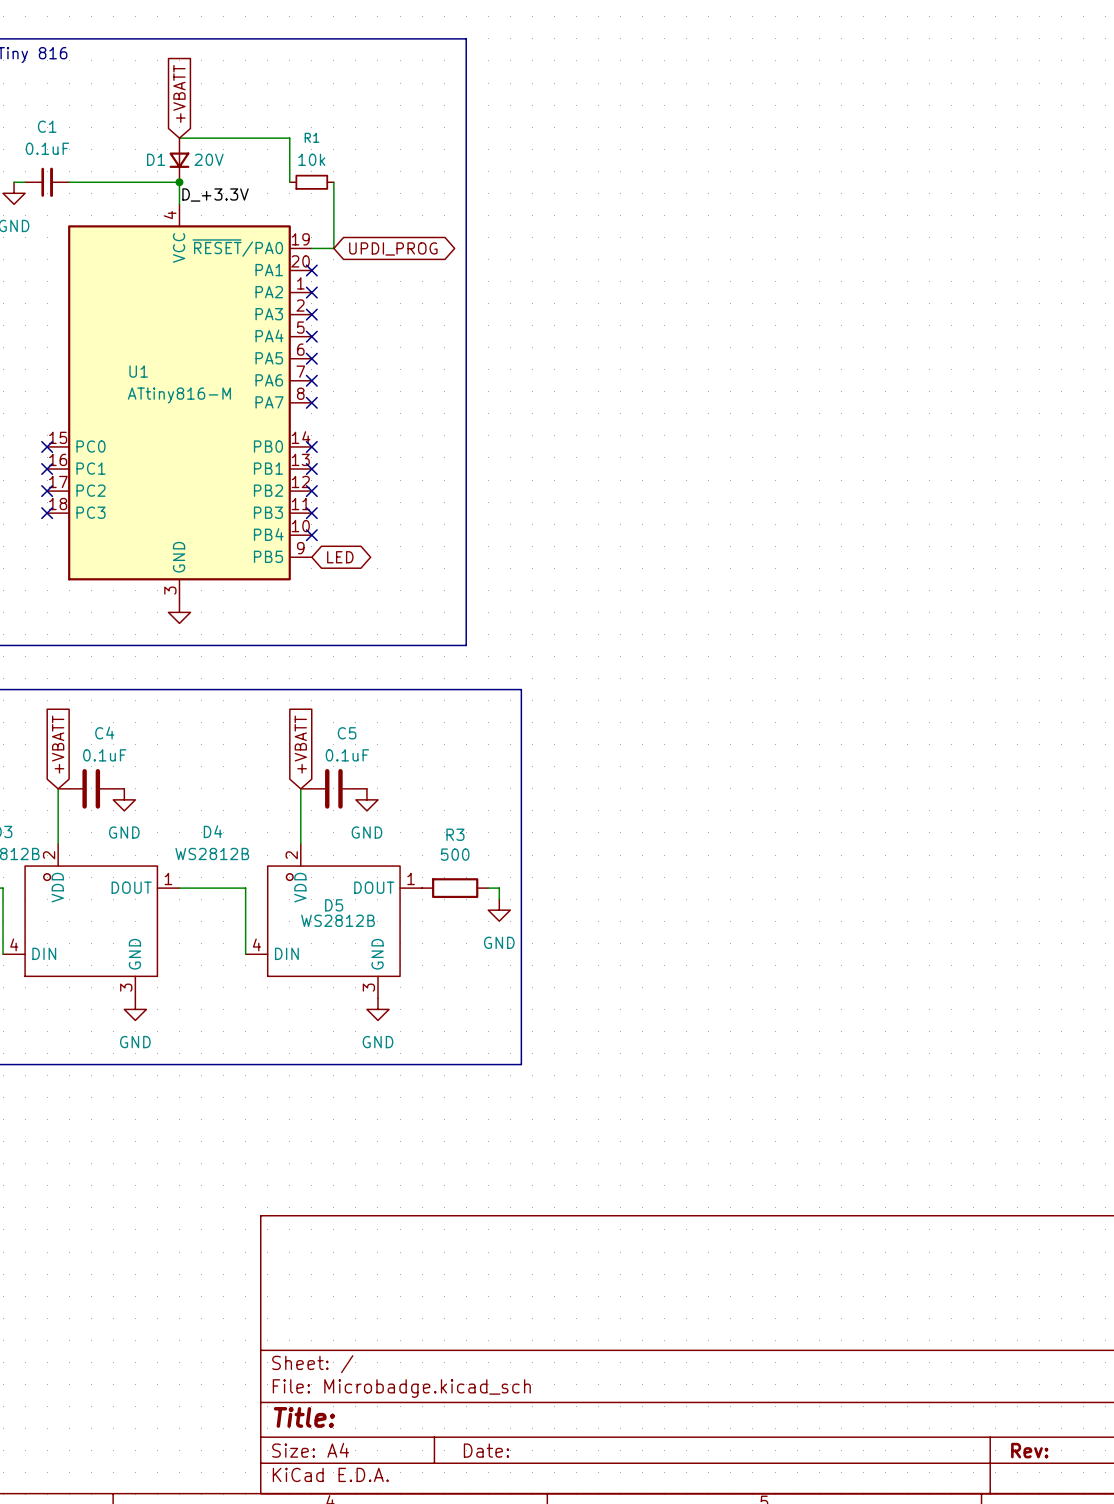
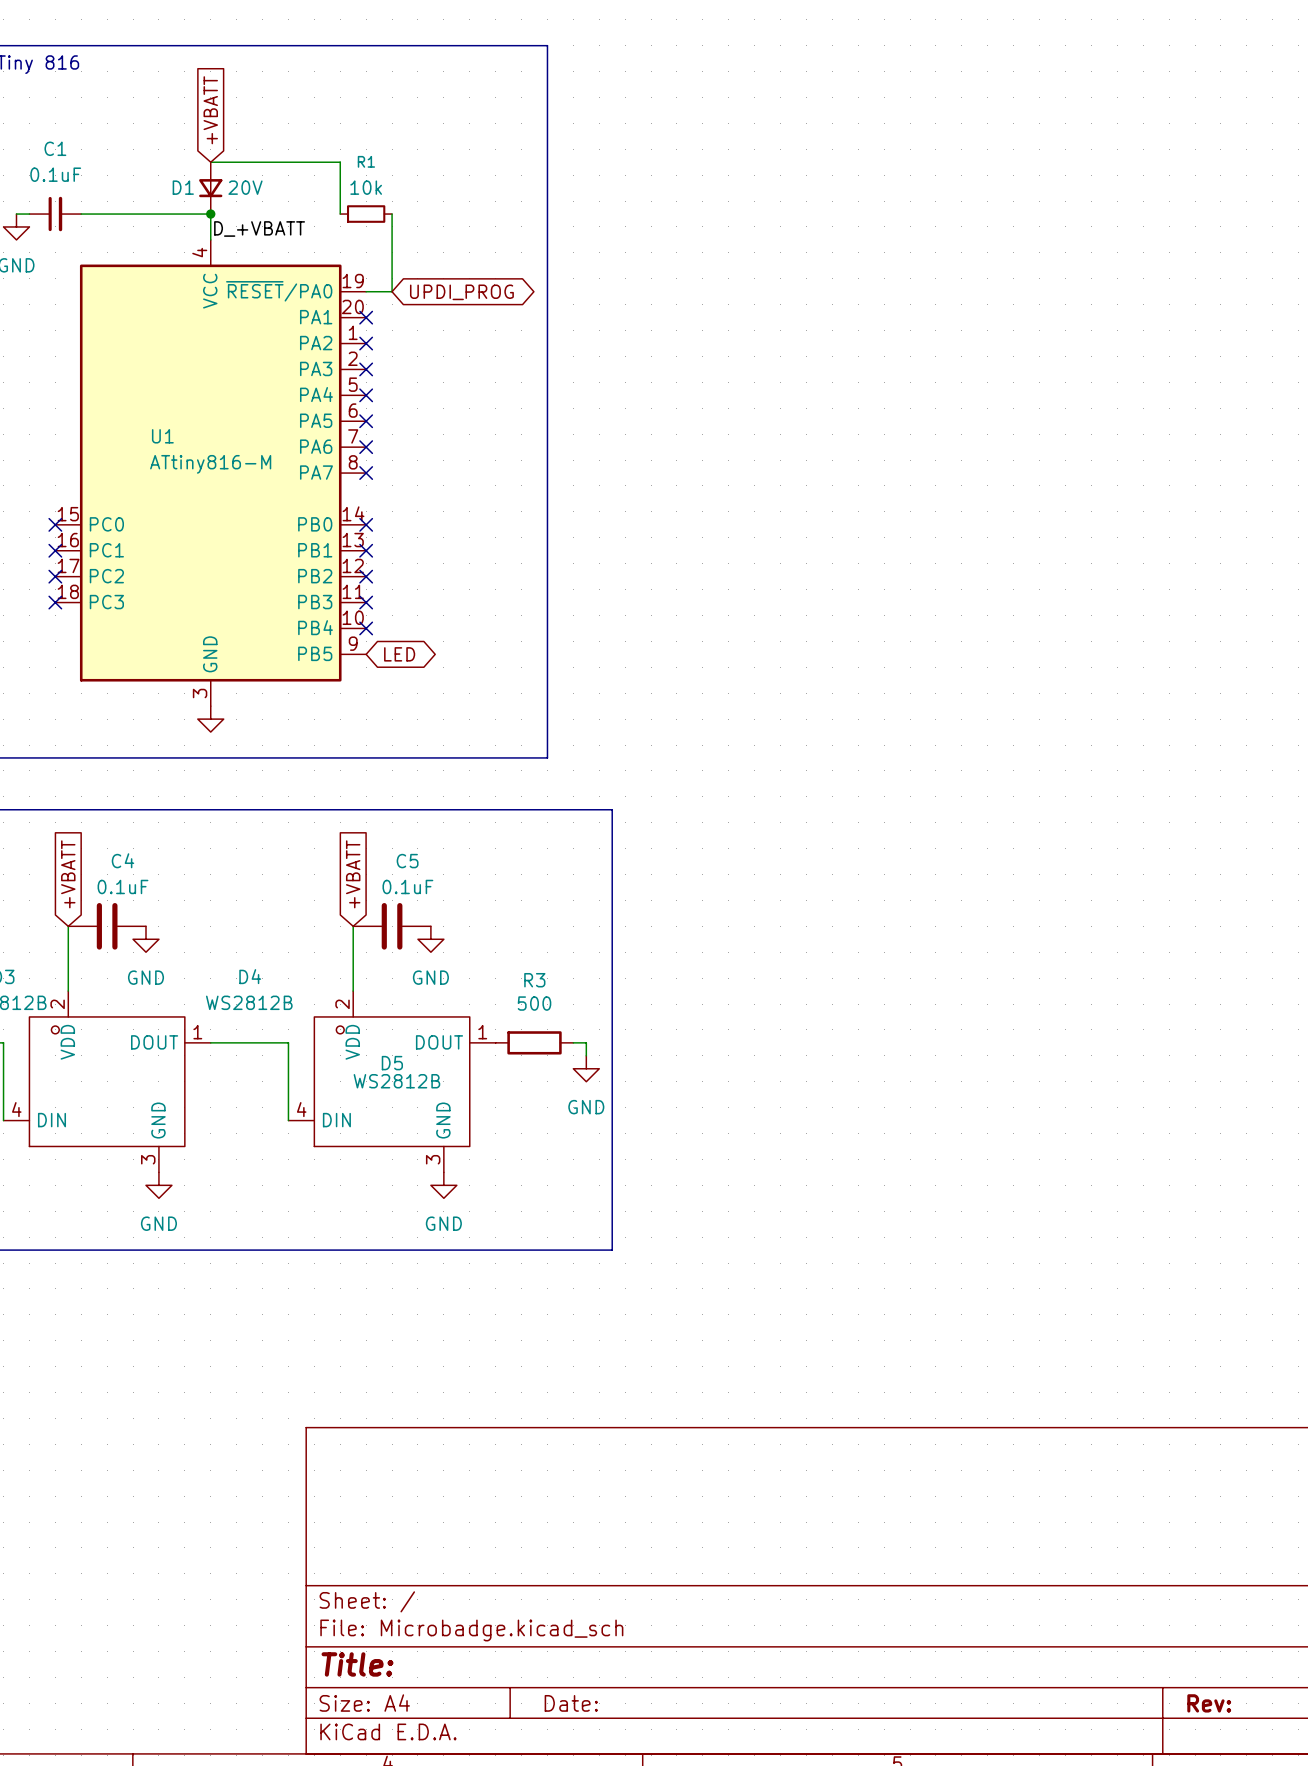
label: D_+3.3V (215, 195) -> D_+VBATT (259, 228)

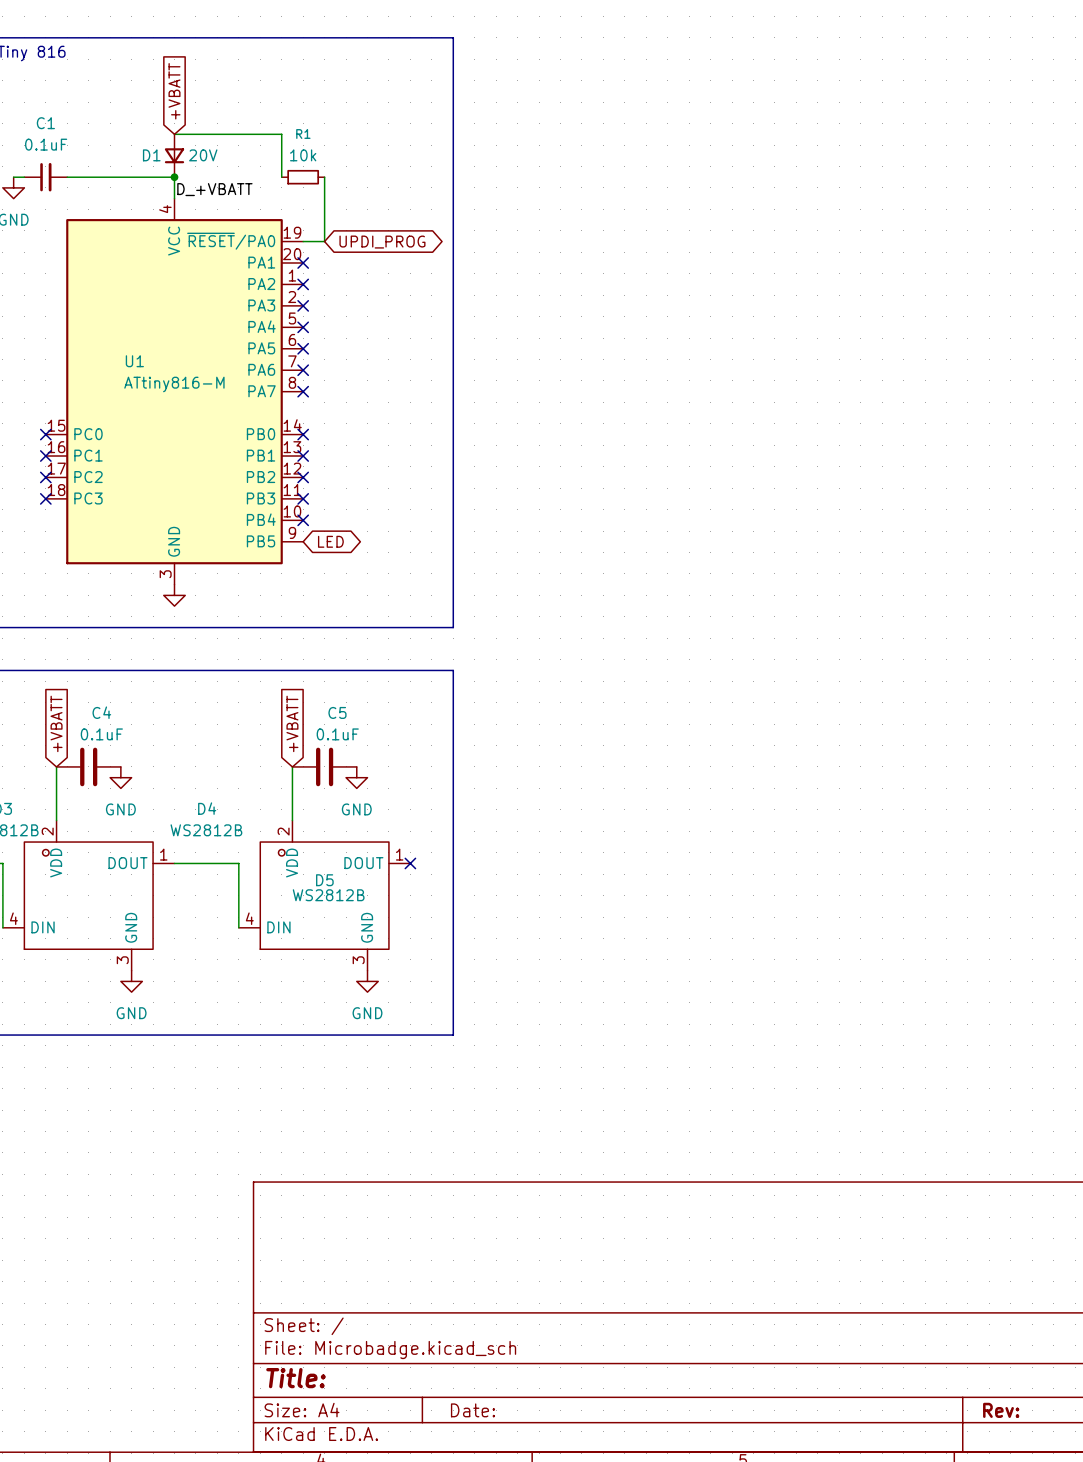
line: (547, 809) (612, 809) (612, 1250) (547, 1250) -> (453, 670) (453, 1035)
no-connect mark: none -> (410, 863)
R3: 500 (534, 1042) -> none
wire: (573, 1042) (586, 1042) (586, 1055) -> none
power symbol: GND (586, 1068) -> none

